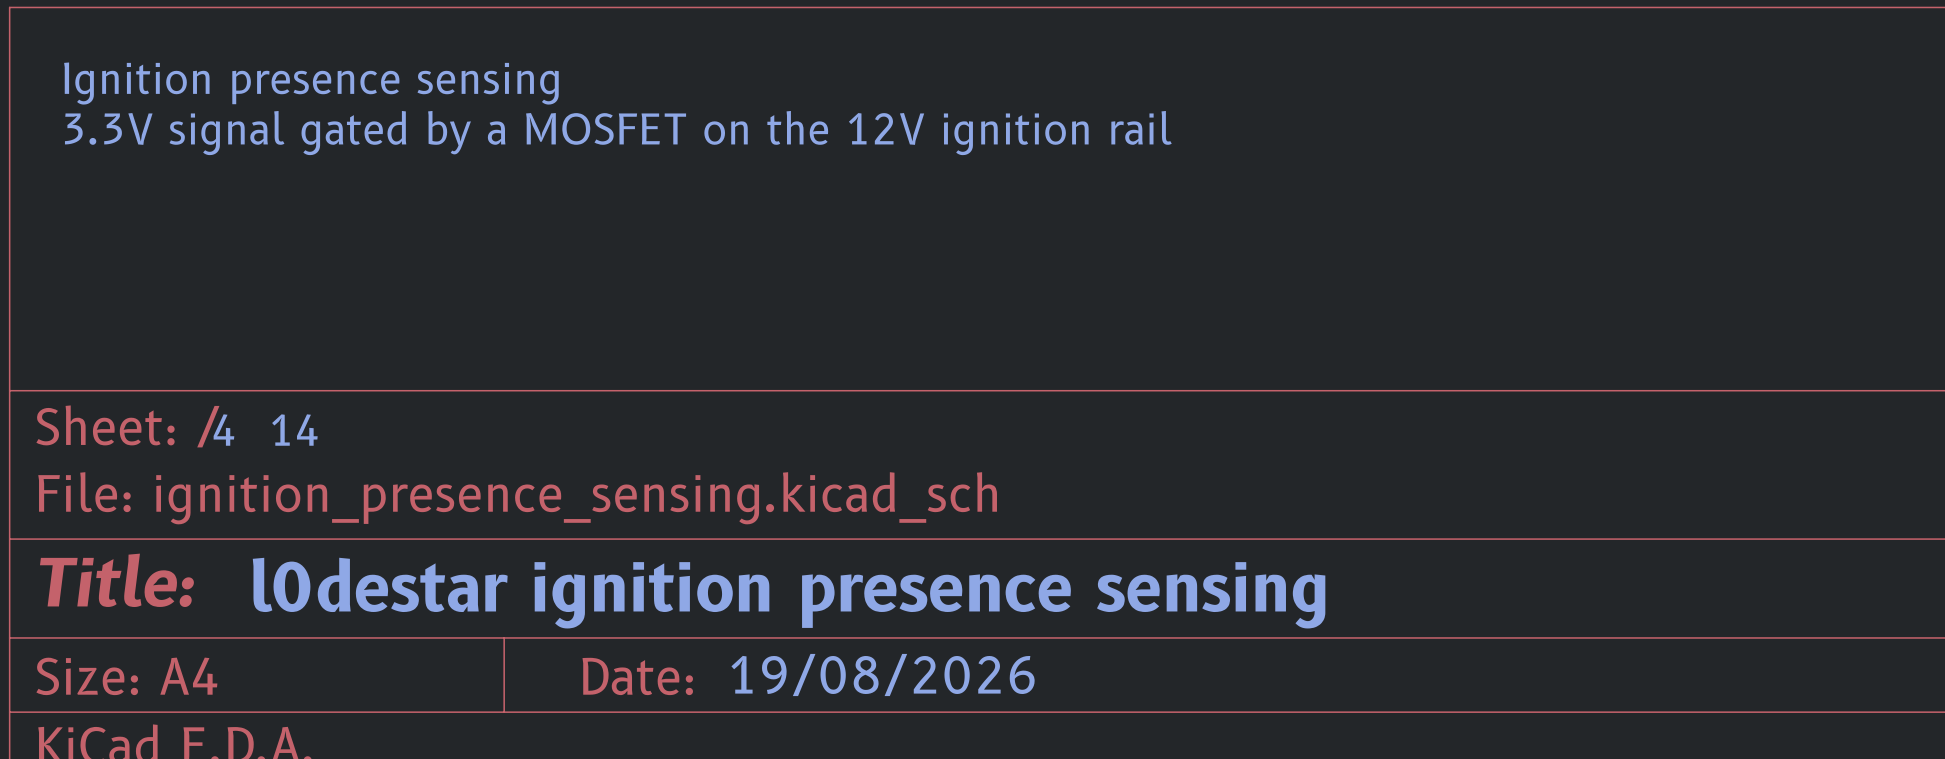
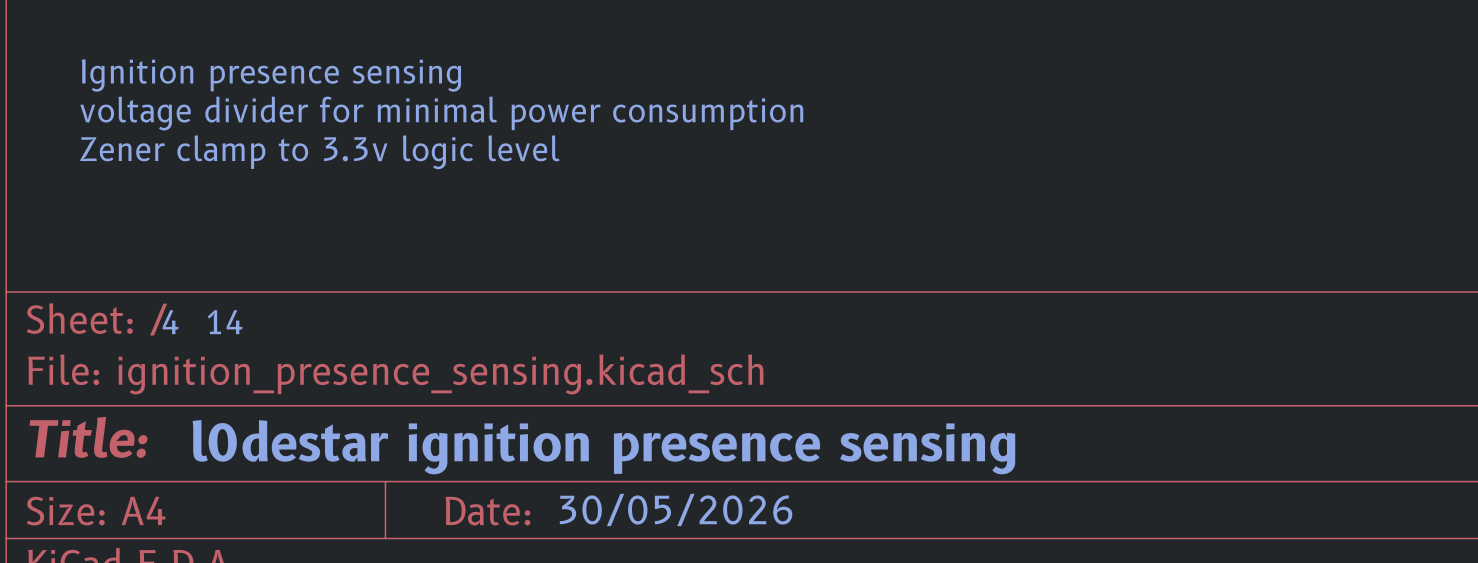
text position: Ignition presence sensing (311, 83) -> Ignition presence sensing (271, 75)
text: 3.3V signal gated by a MOSFET on the 12V ignition rail (618, 133) -> none
text: none -> voltage divider for minimal power consumption (441, 113)
text: none -> Zener clamp to 3.3v logic level (319, 152)
text: 19/08/2026 (883, 674) -> 30/05/2026 (676, 509)

